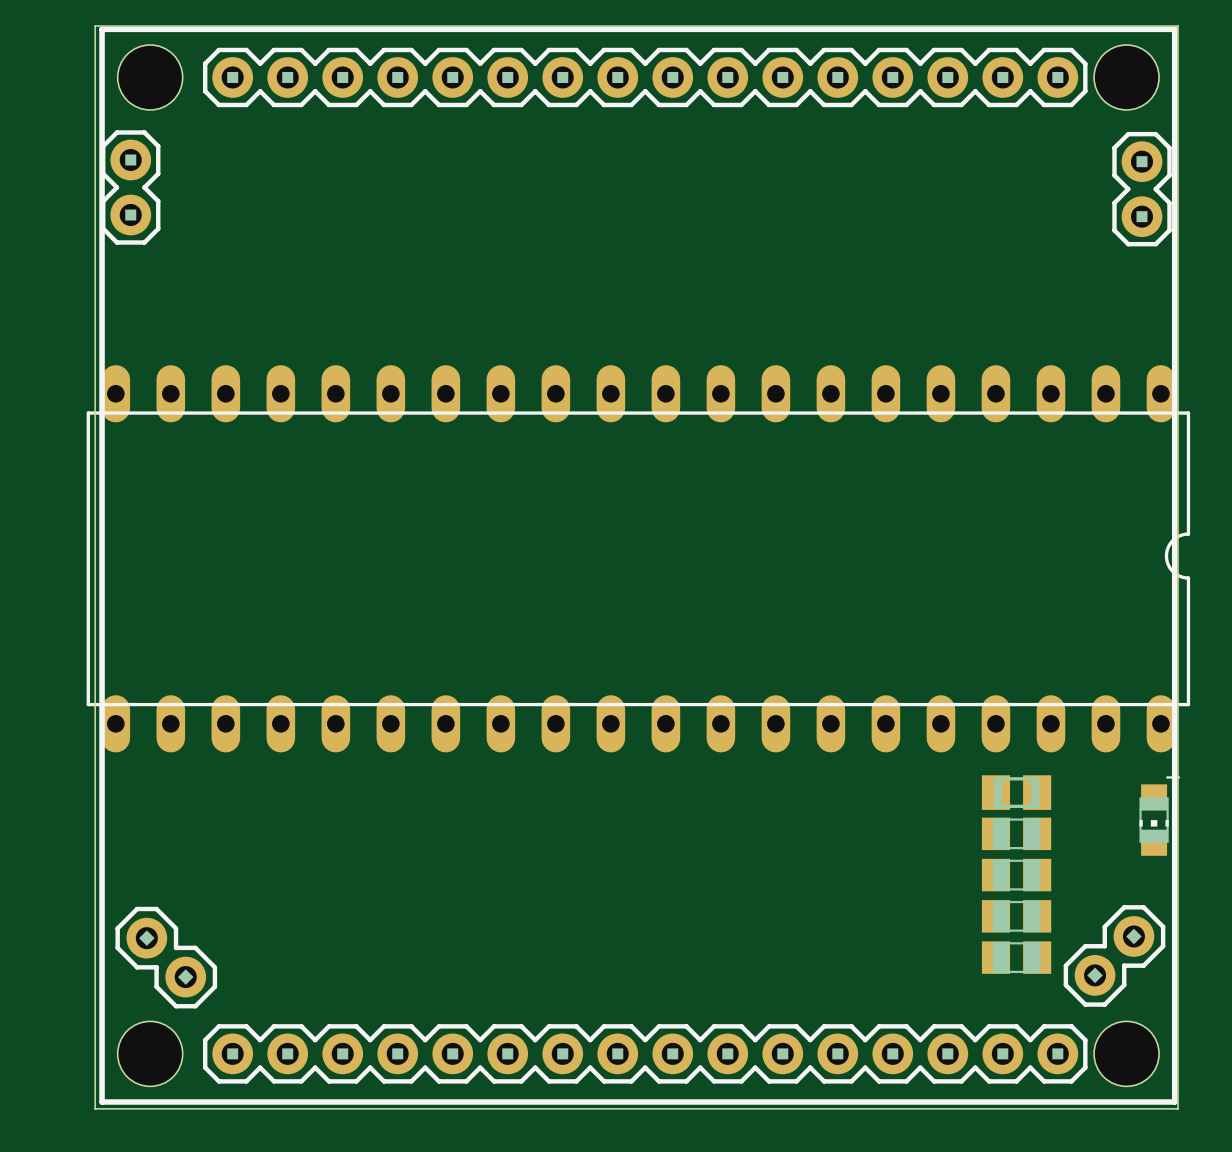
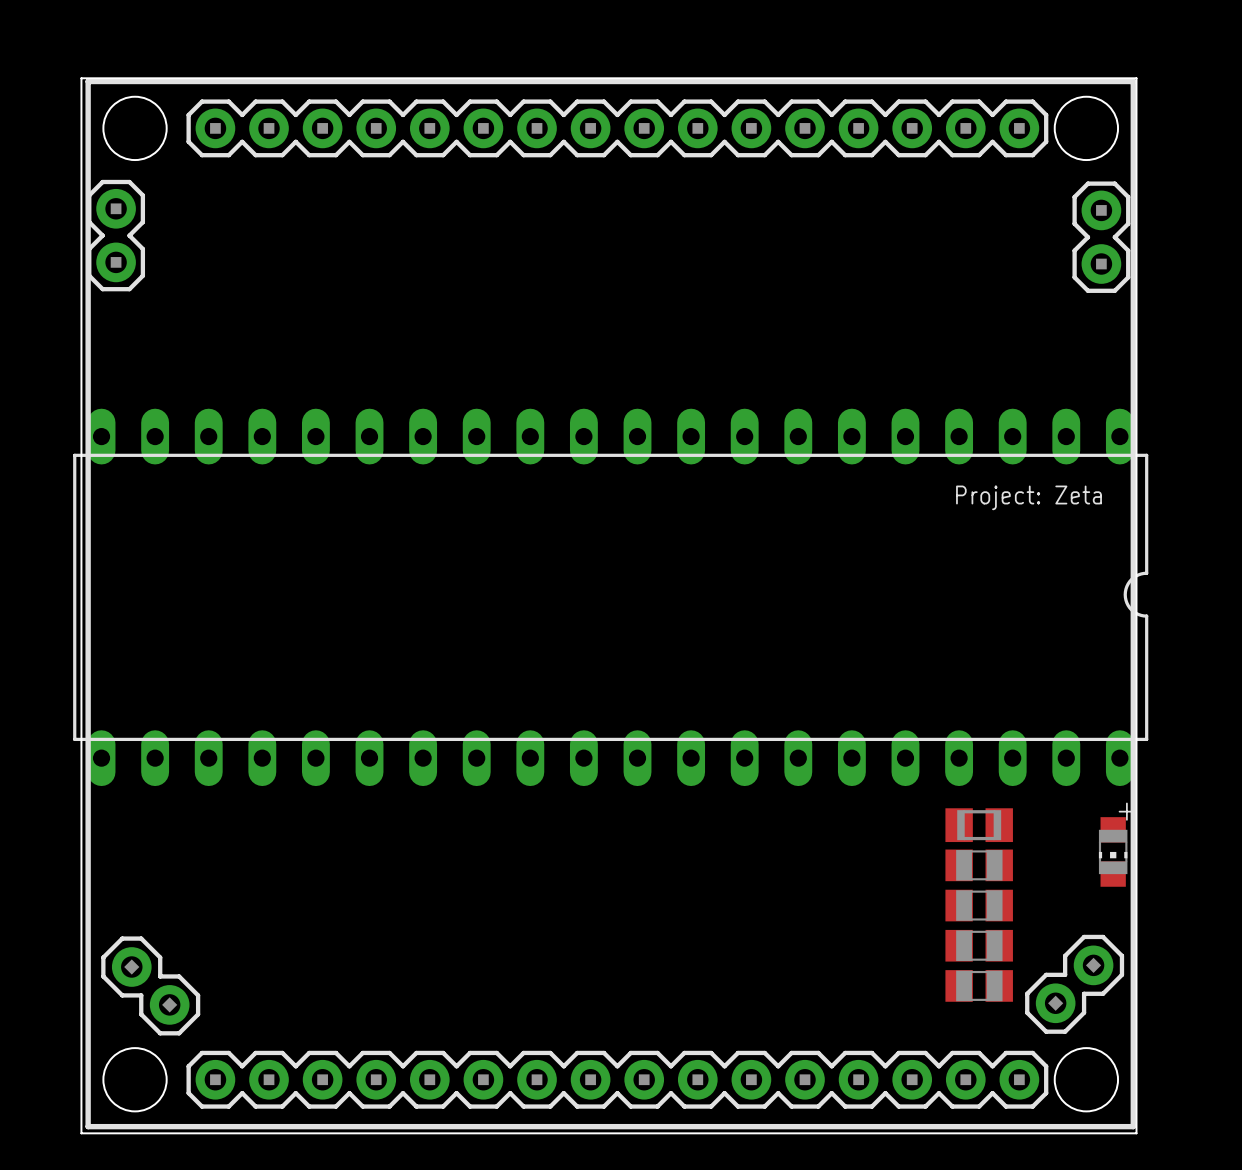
text: none -> Project: Zeta (1029, 497)

